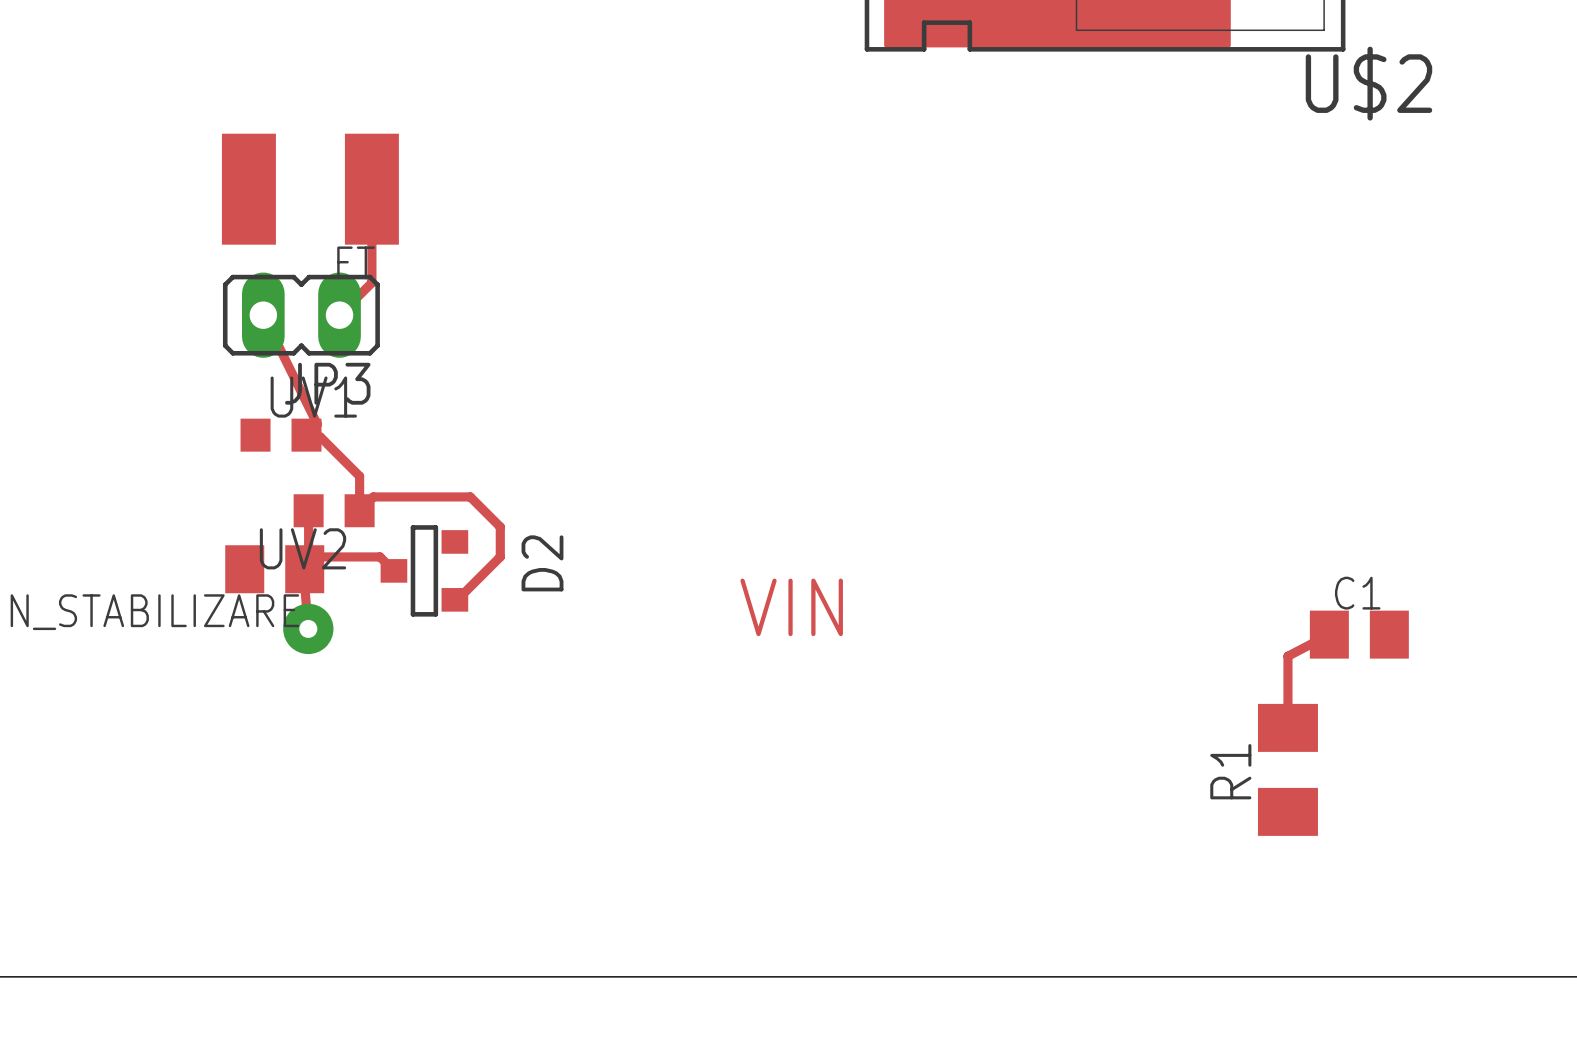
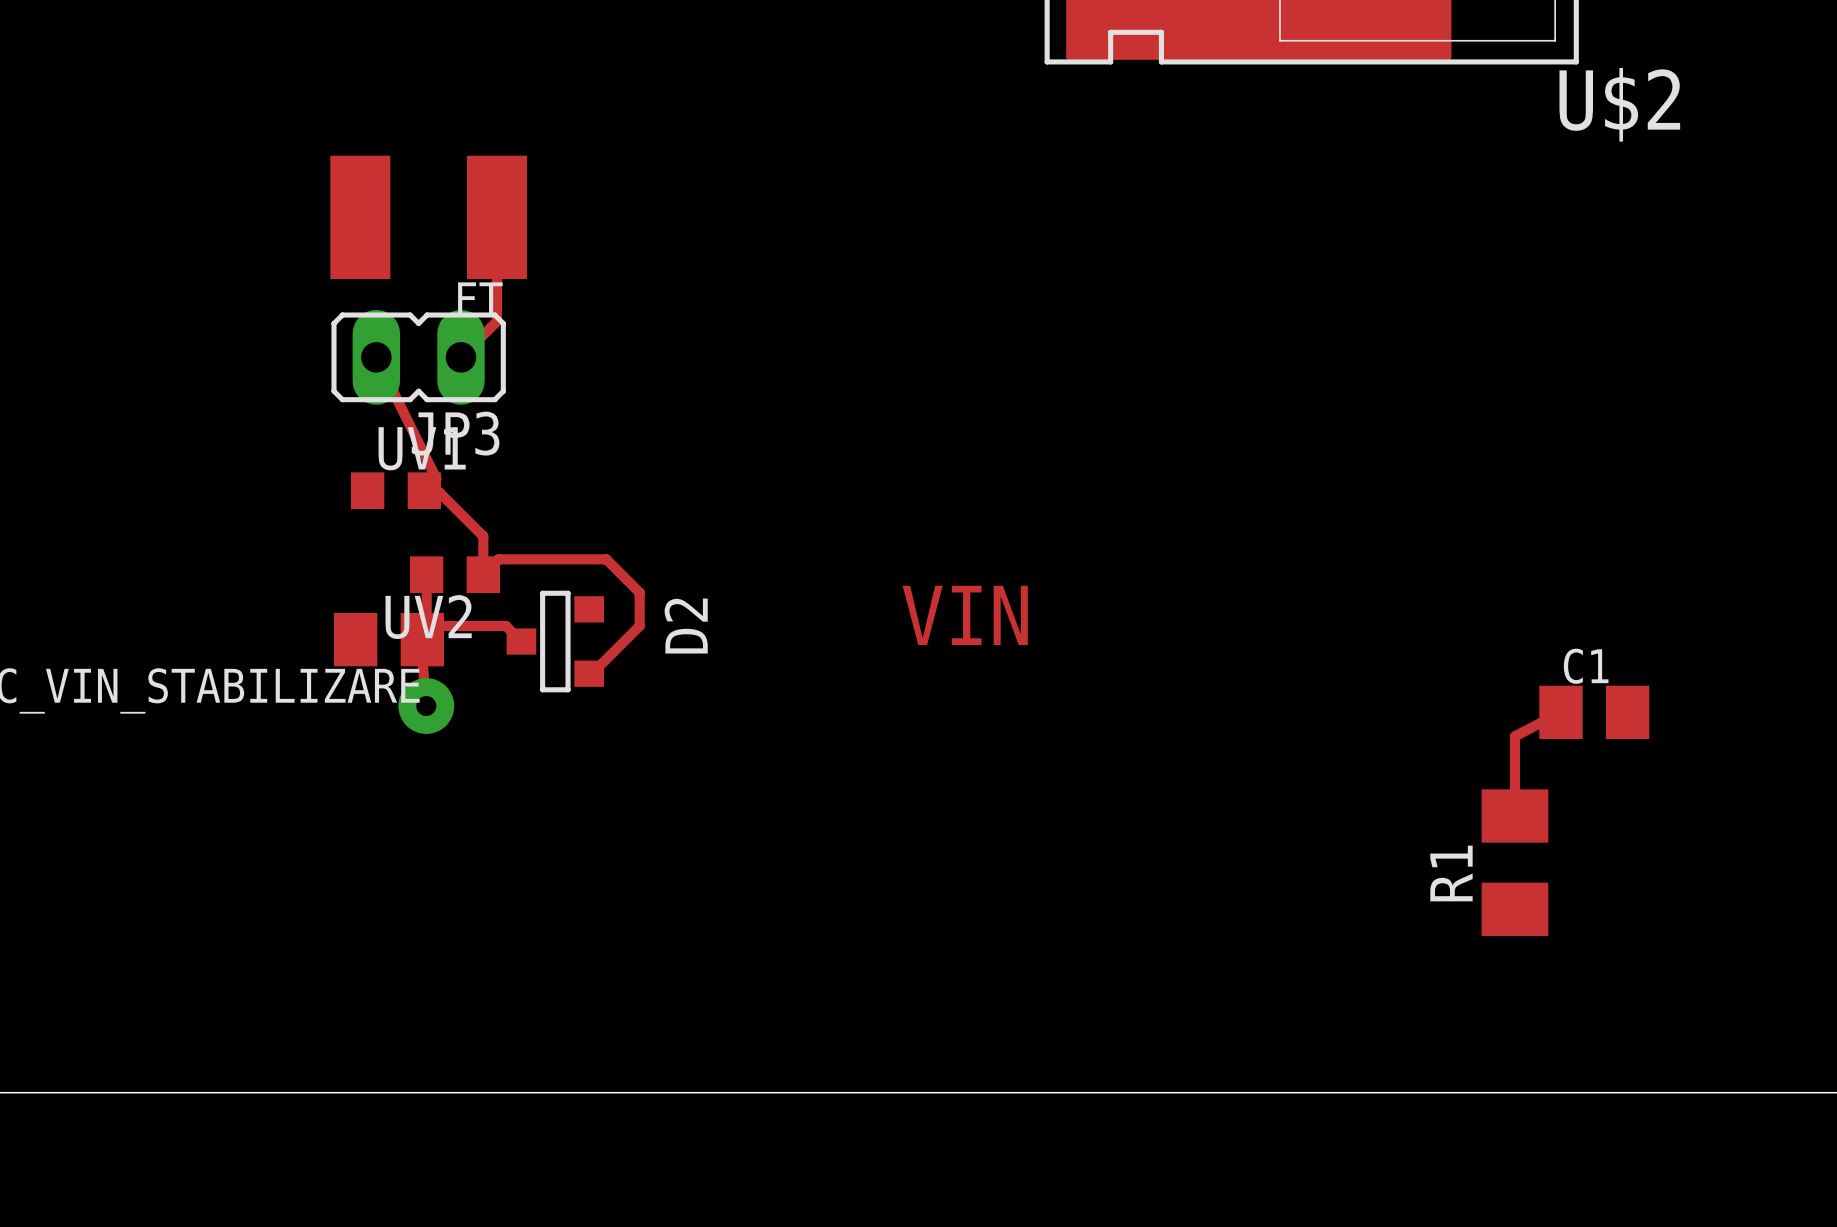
text position: VIN (791, 607) -> VIN (965, 615)

